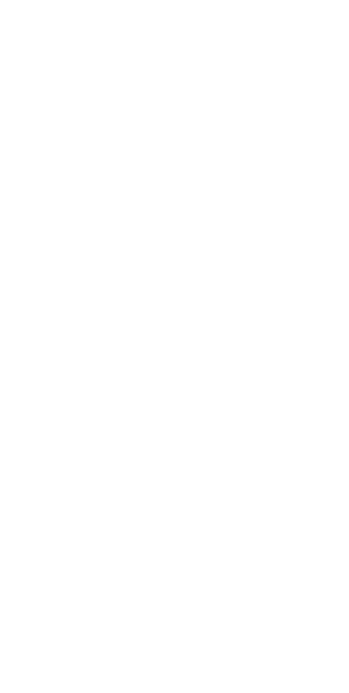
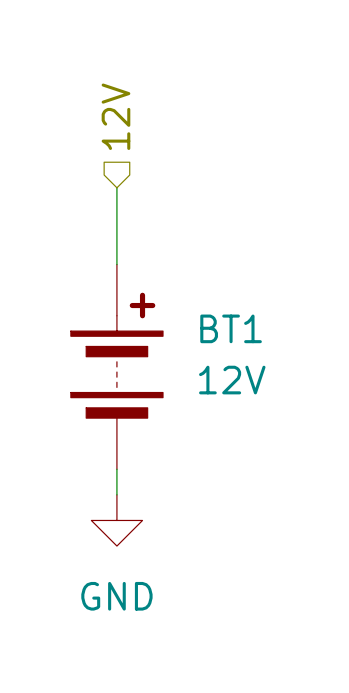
hierarchical label: none -> 12V (115, 116)
wire: none -> (116, 187) (116, 264)
BT1: none -> 12V (116, 366)
wire: none -> (116, 469) (116, 494)
power symbol: none -> GND (116, 520)

